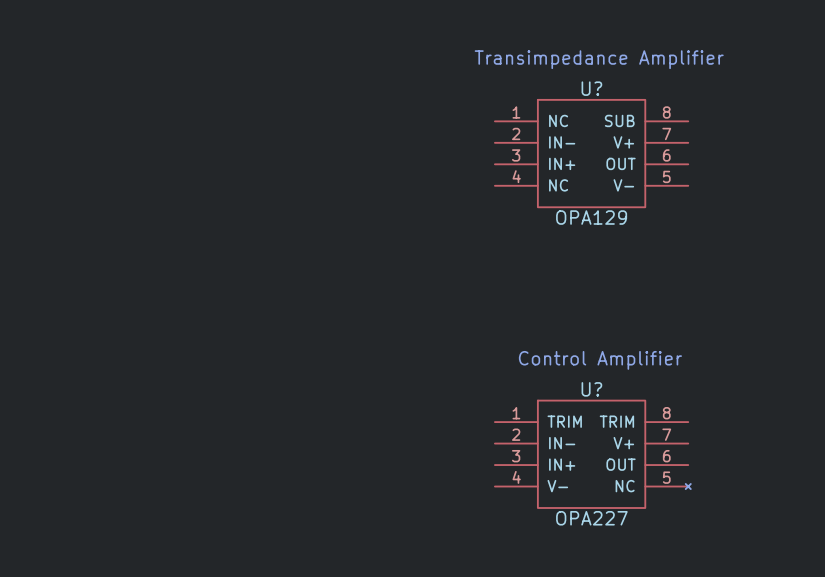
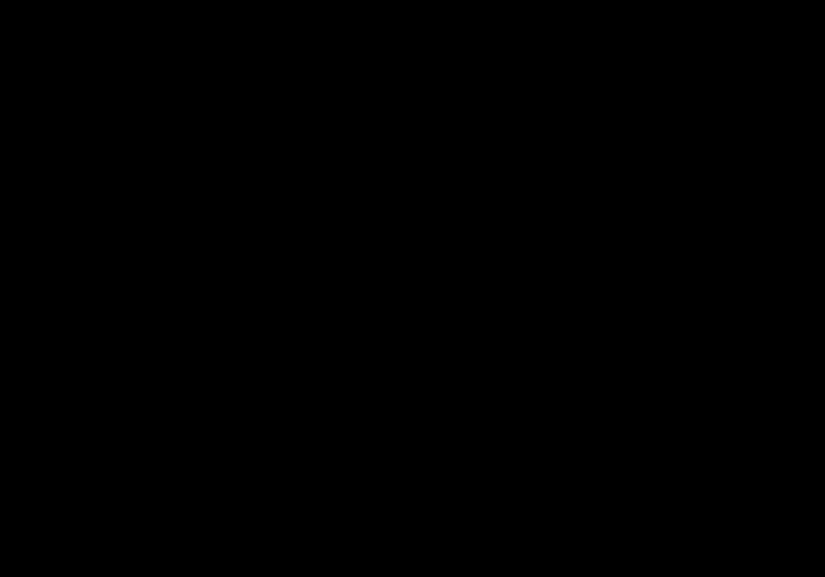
text: Transimpedance Amplifier (599, 59) -> none
U?: OPA129 (591, 153) -> none
text: Control Amplifier (600, 360) -> none
U?: OPA227 (592, 454) -> none

